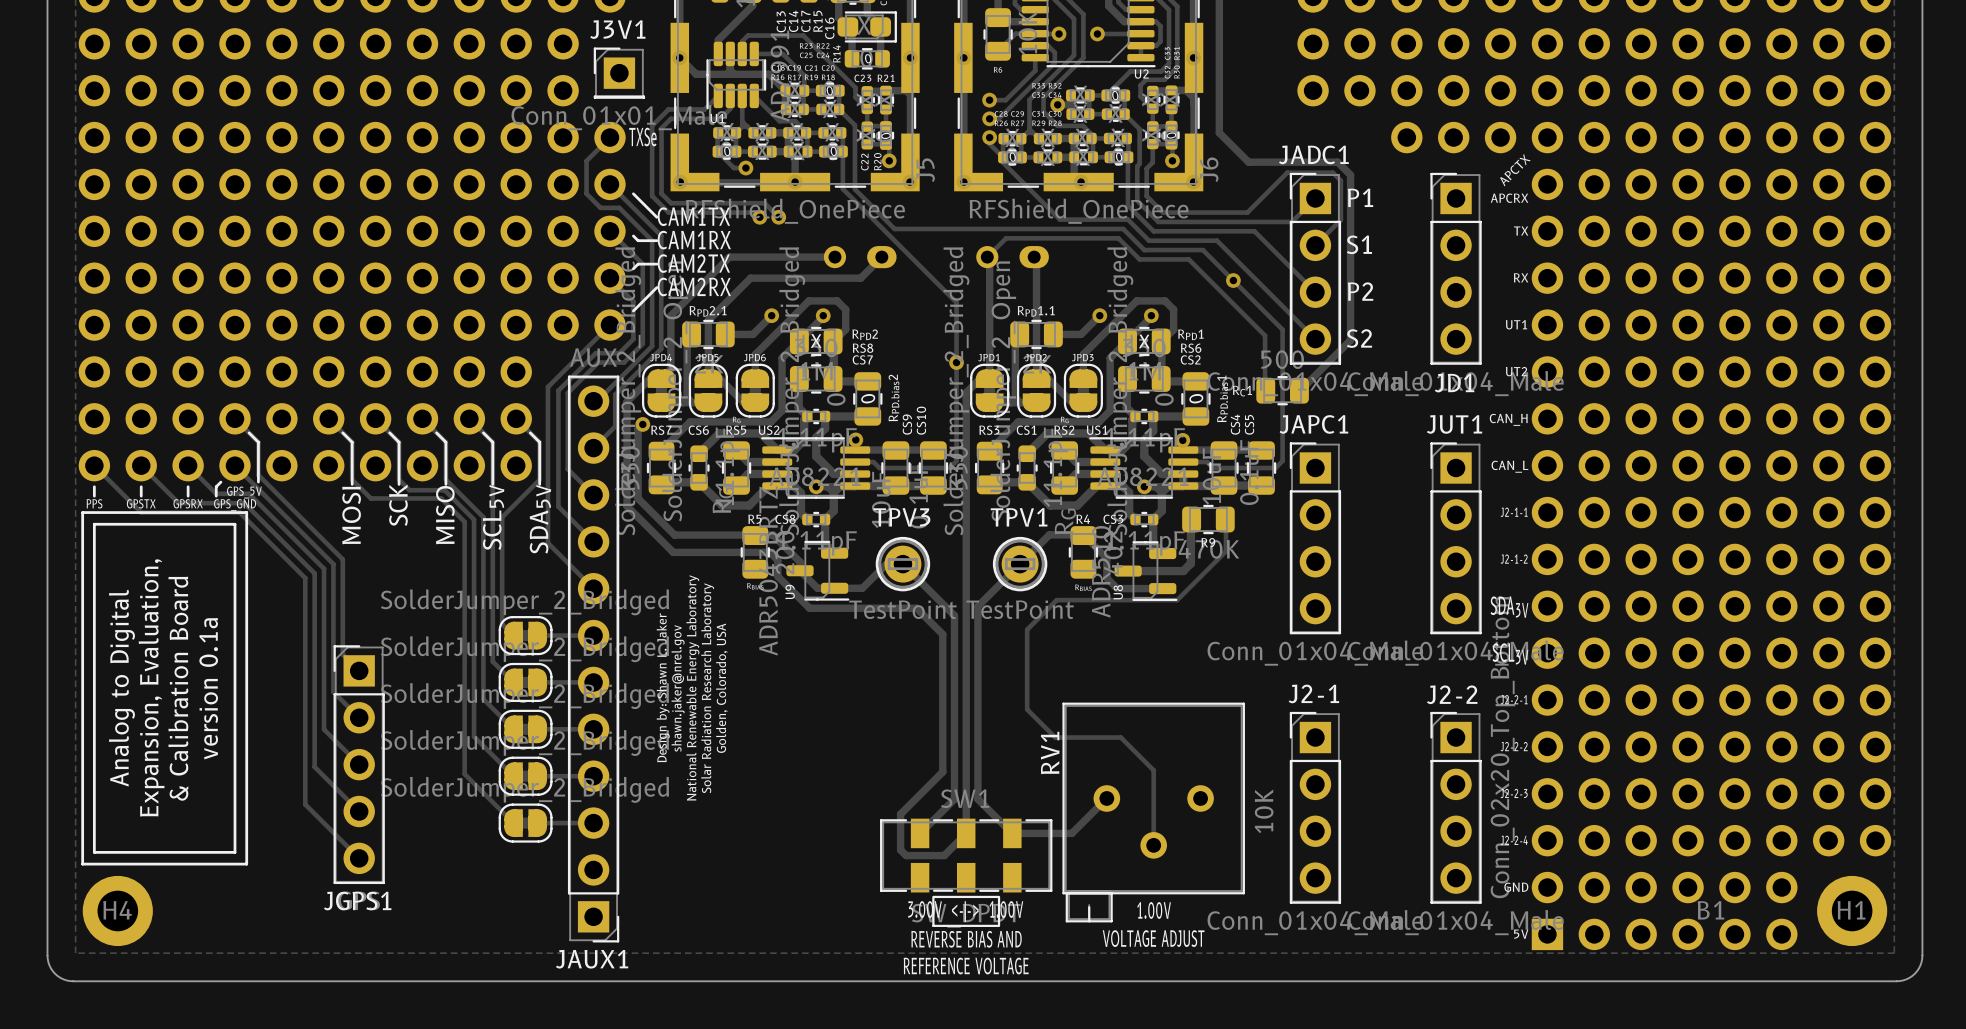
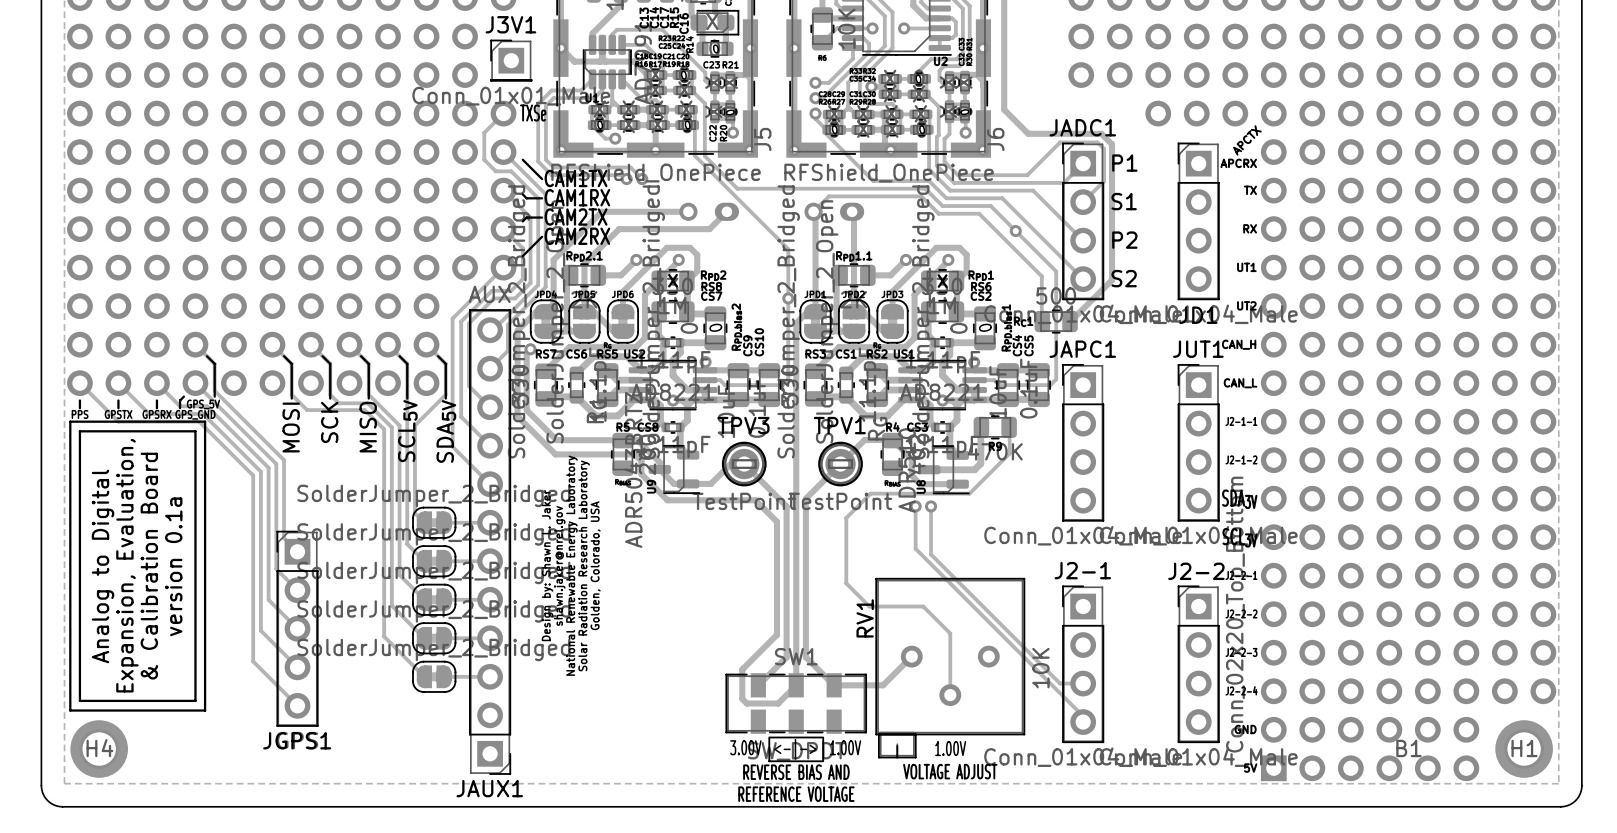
track: none -> (915, 506) (915, 548) (1083, 716) (1083, 722)
via: none -> (915, 506)
track: none -> (931, 506) (931, 554) (1060, 683) (1083, 683)
via: none -> (931, 506)

